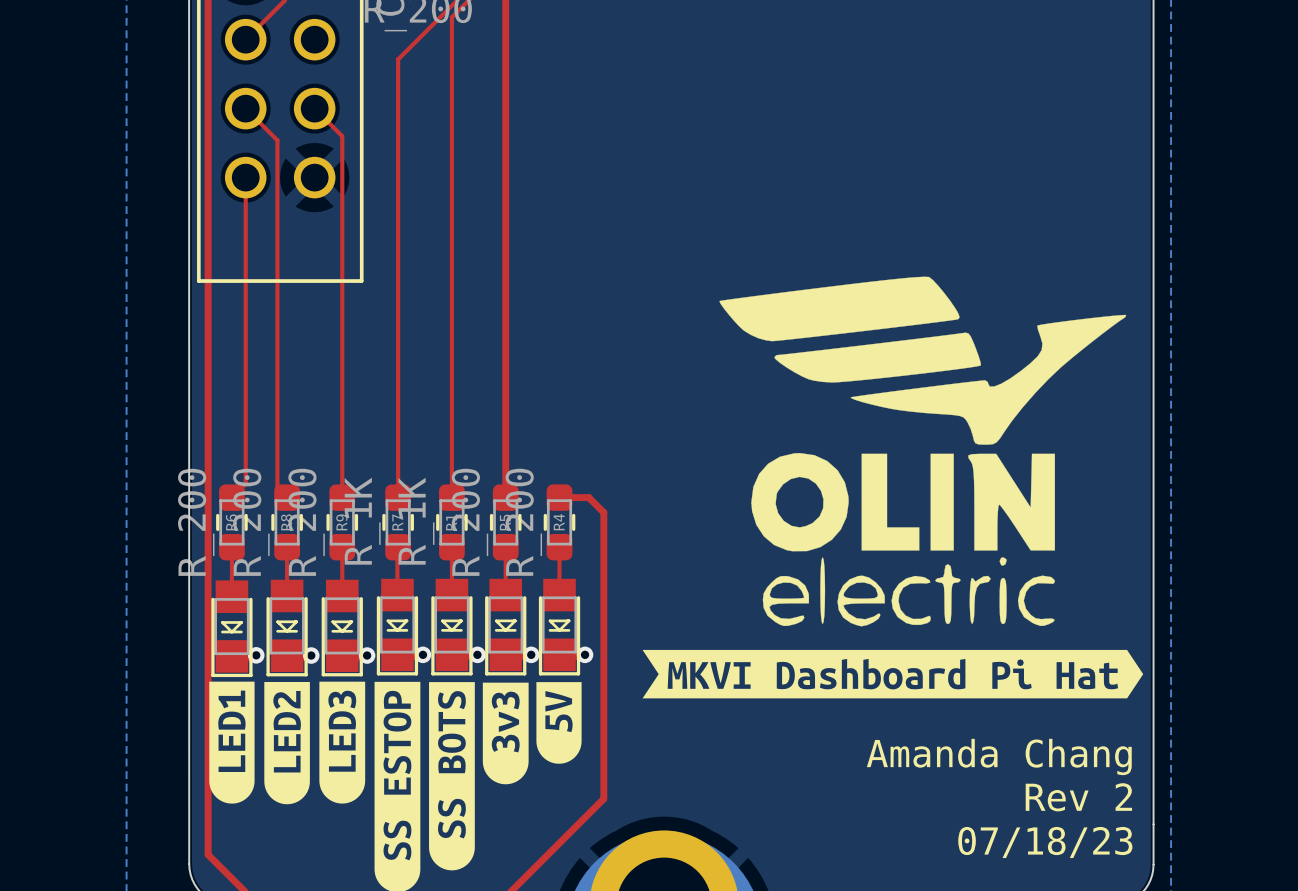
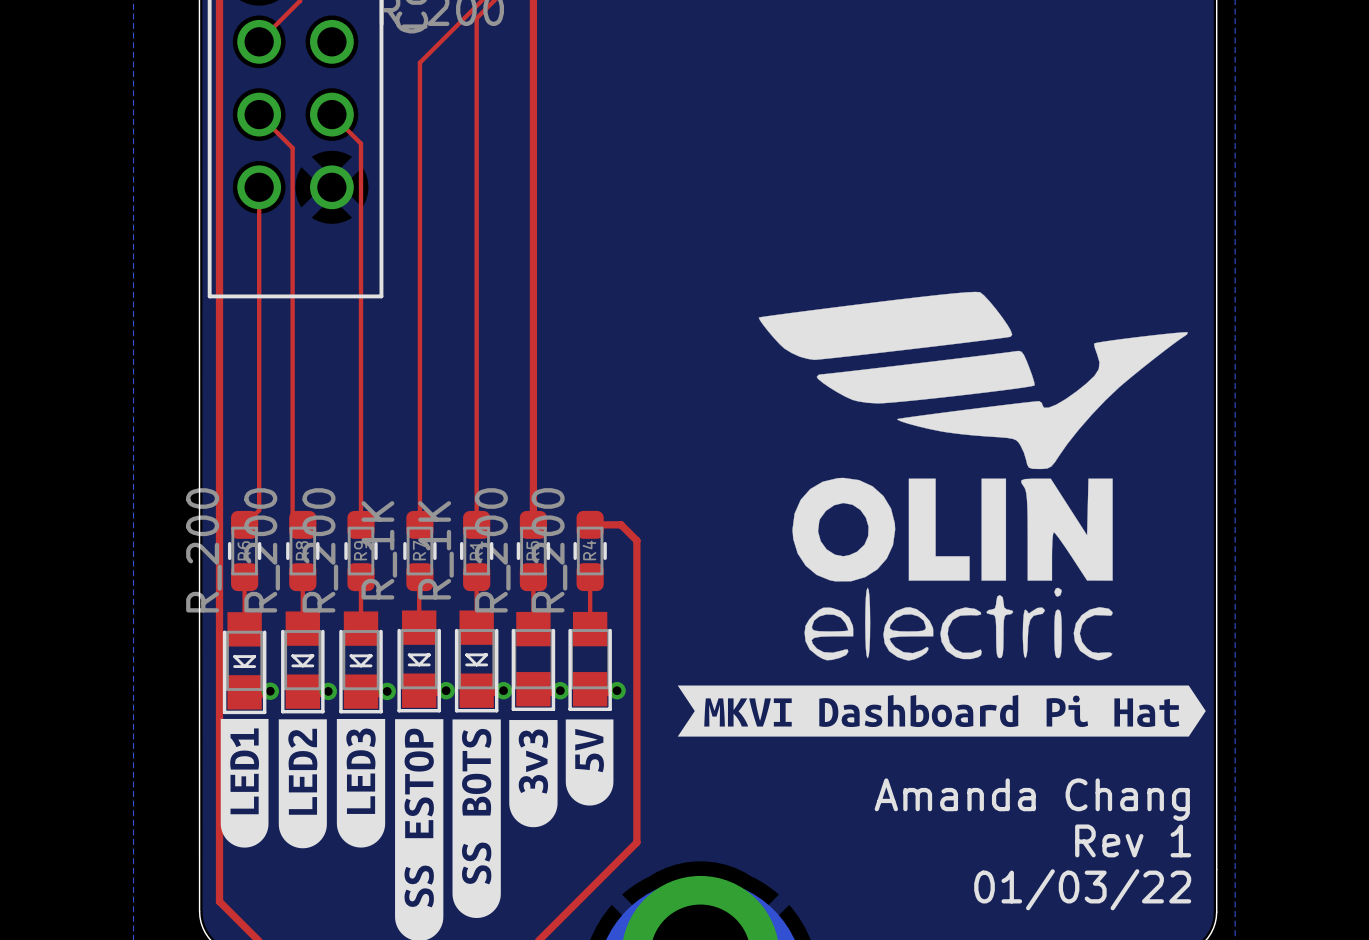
part footprint: [485, 578, 527, 676] -> [511, 611, 556, 712]
part footprint: [538, 578, 581, 676] -> [568, 611, 612, 712]
text: Rev 2 (1078, 797) -> Rev 1 (1133, 840)
text: 07/18/23 (1045, 842) -> 01/03/22 (1082, 889)

